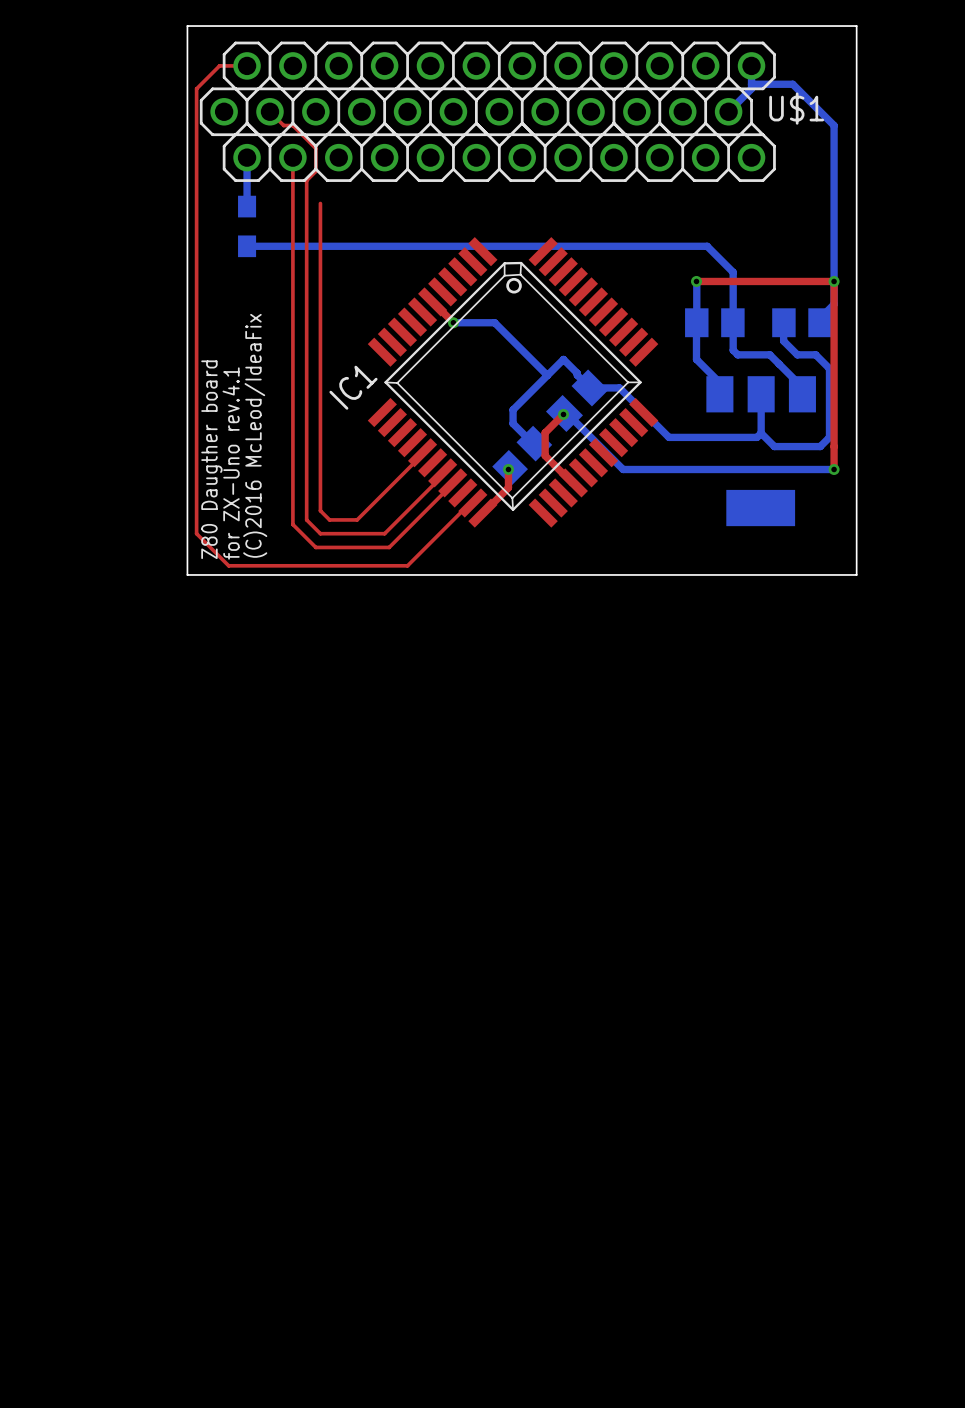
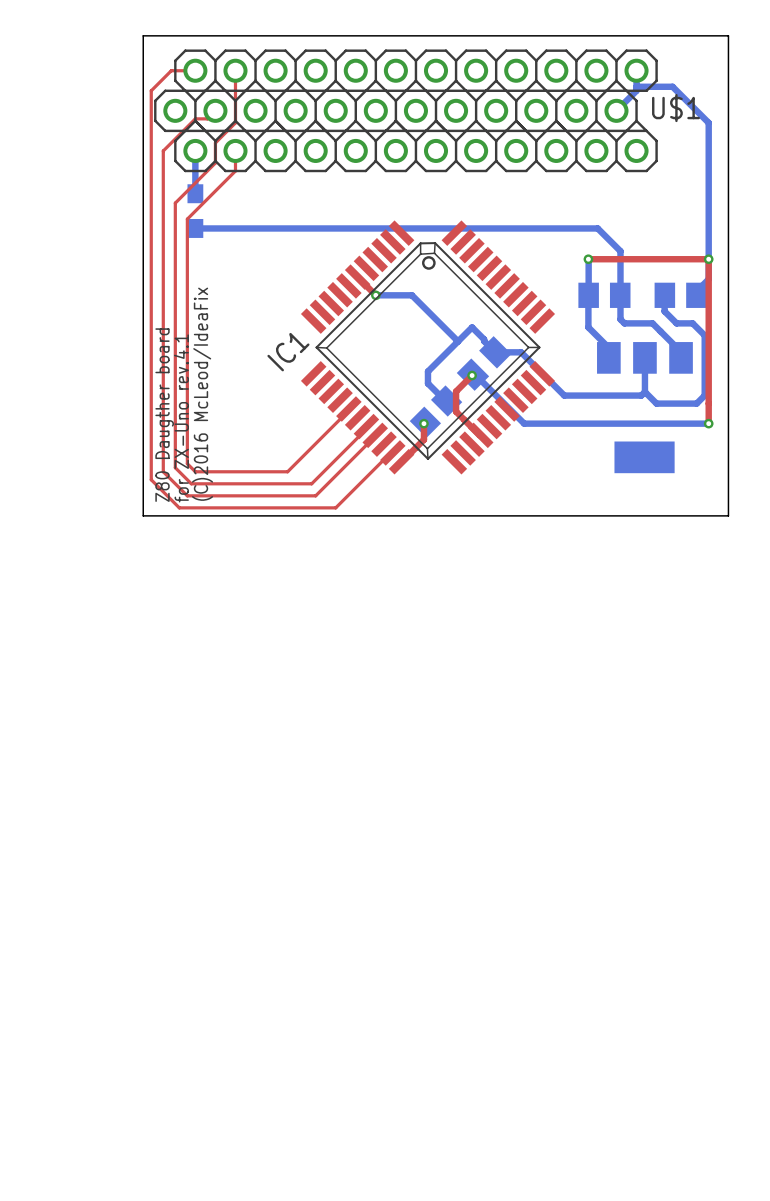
top track: none -> (235, 70) (235, 122) (215, 142) (215, 162) (175, 203) (175, 467) (191, 483) (311, 483) (315, 479)
top track: (269, 111) (283, 125) (292, 125) (315, 148) (315, 171) (306, 180) (306, 519) (320, 533) (384, 533) -> (215, 110) (207, 118) (195, 118) (163, 150) (163, 471) (187, 495) (315, 495) (319, 491)
top track: (292, 180) (292, 524) (315, 547) (389, 547) -> none
top track: (320, 203) (320, 510) (329, 519) (357, 519) -> (235, 170) (187, 219) (187, 463) (195, 471) (287, 471) (291, 467)

